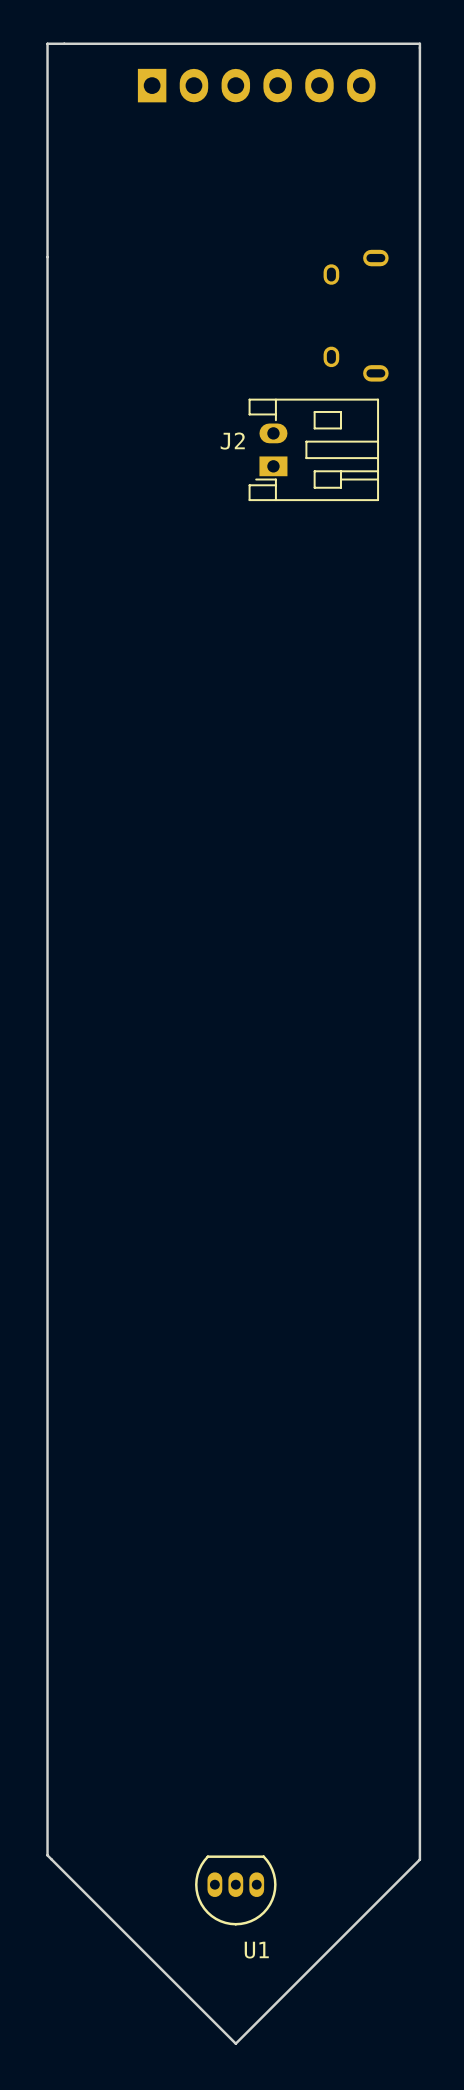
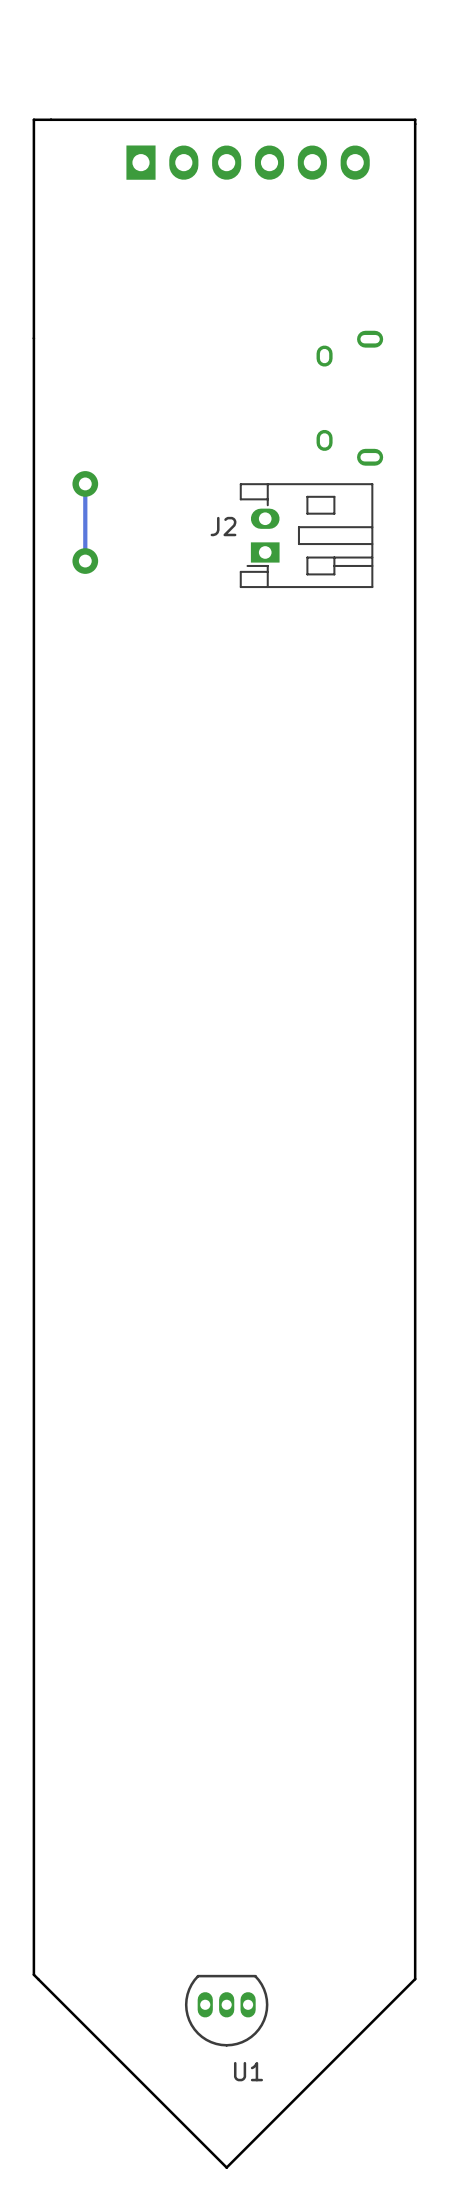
track: none -> (85, 483) (85, 561)
via: none -> (85, 483)
via: none -> (85, 561)

